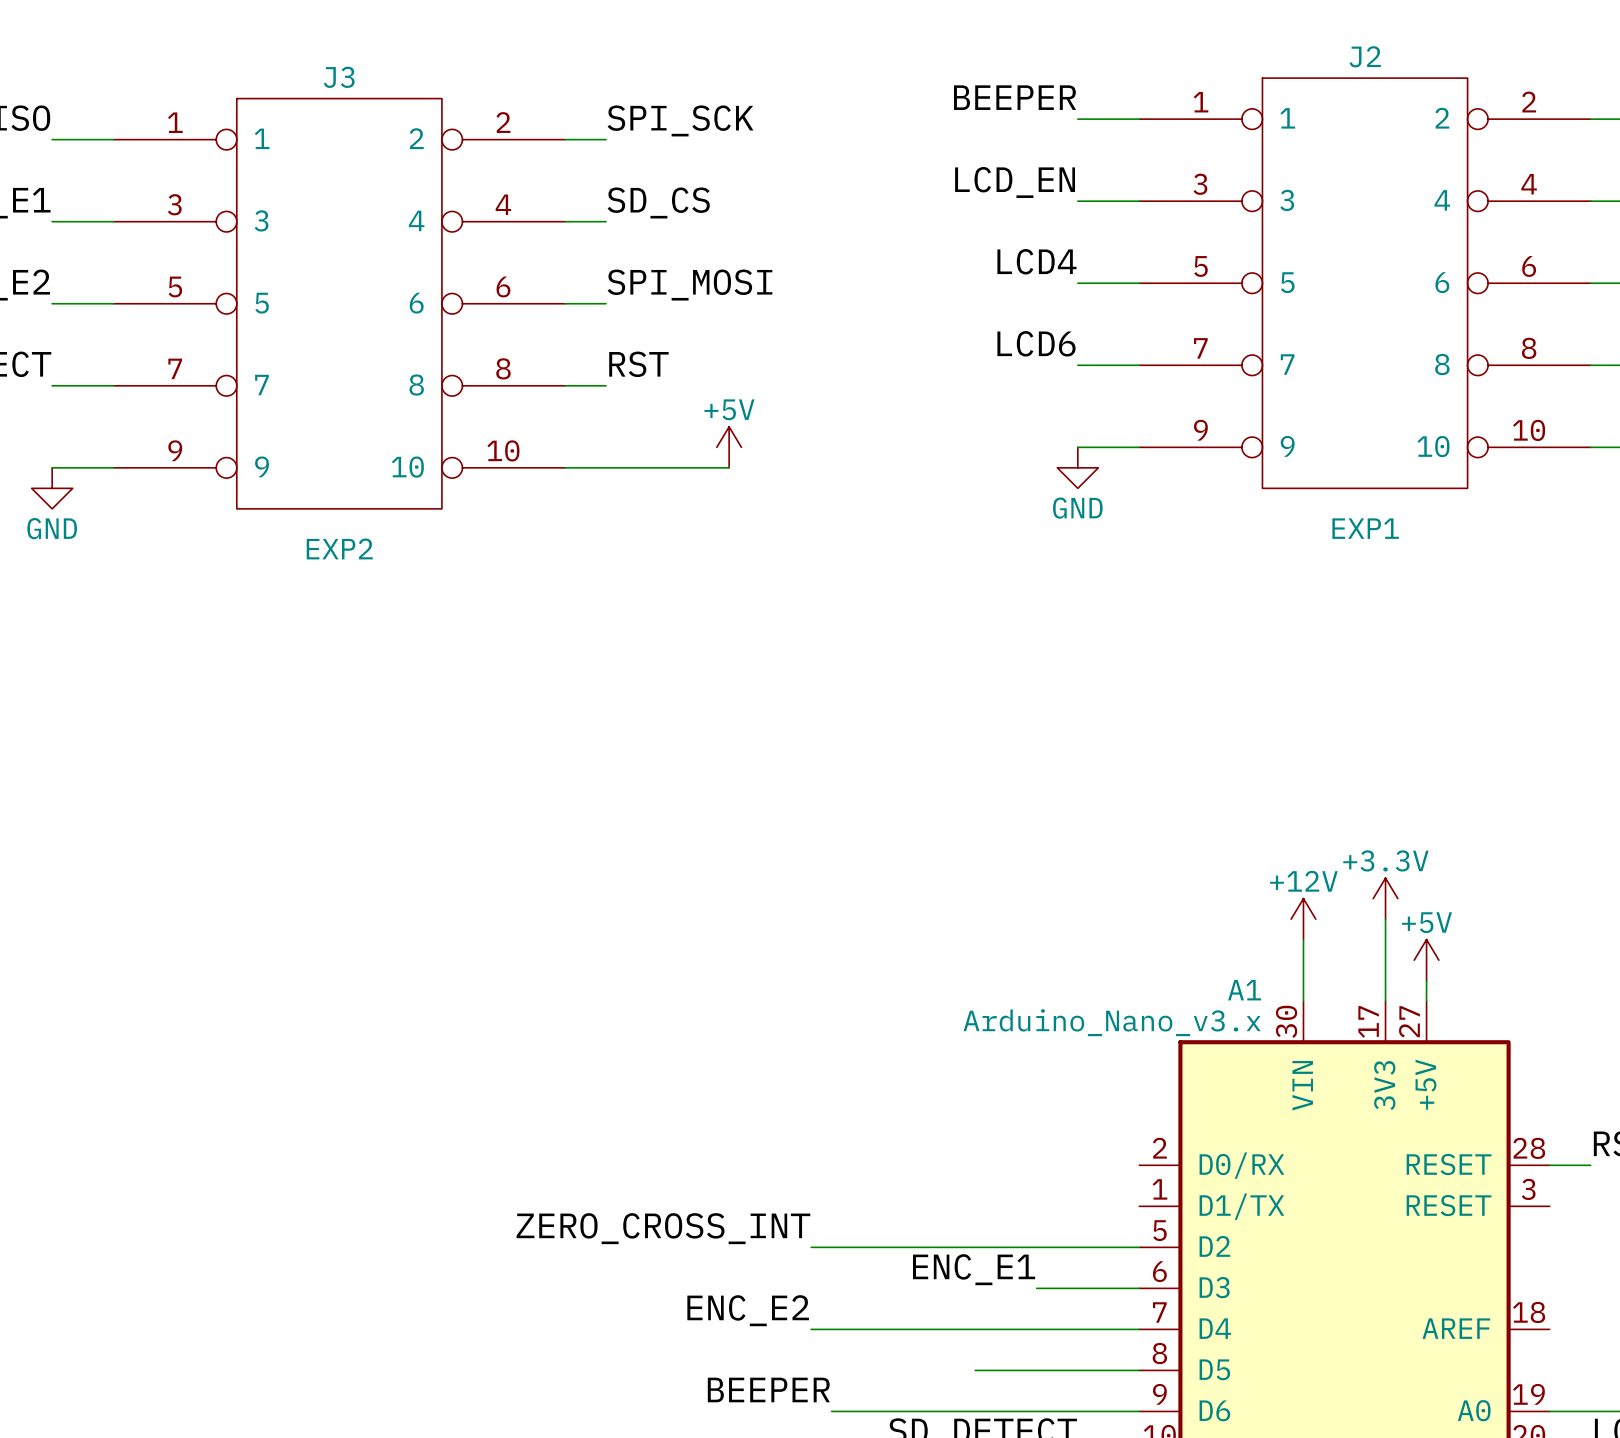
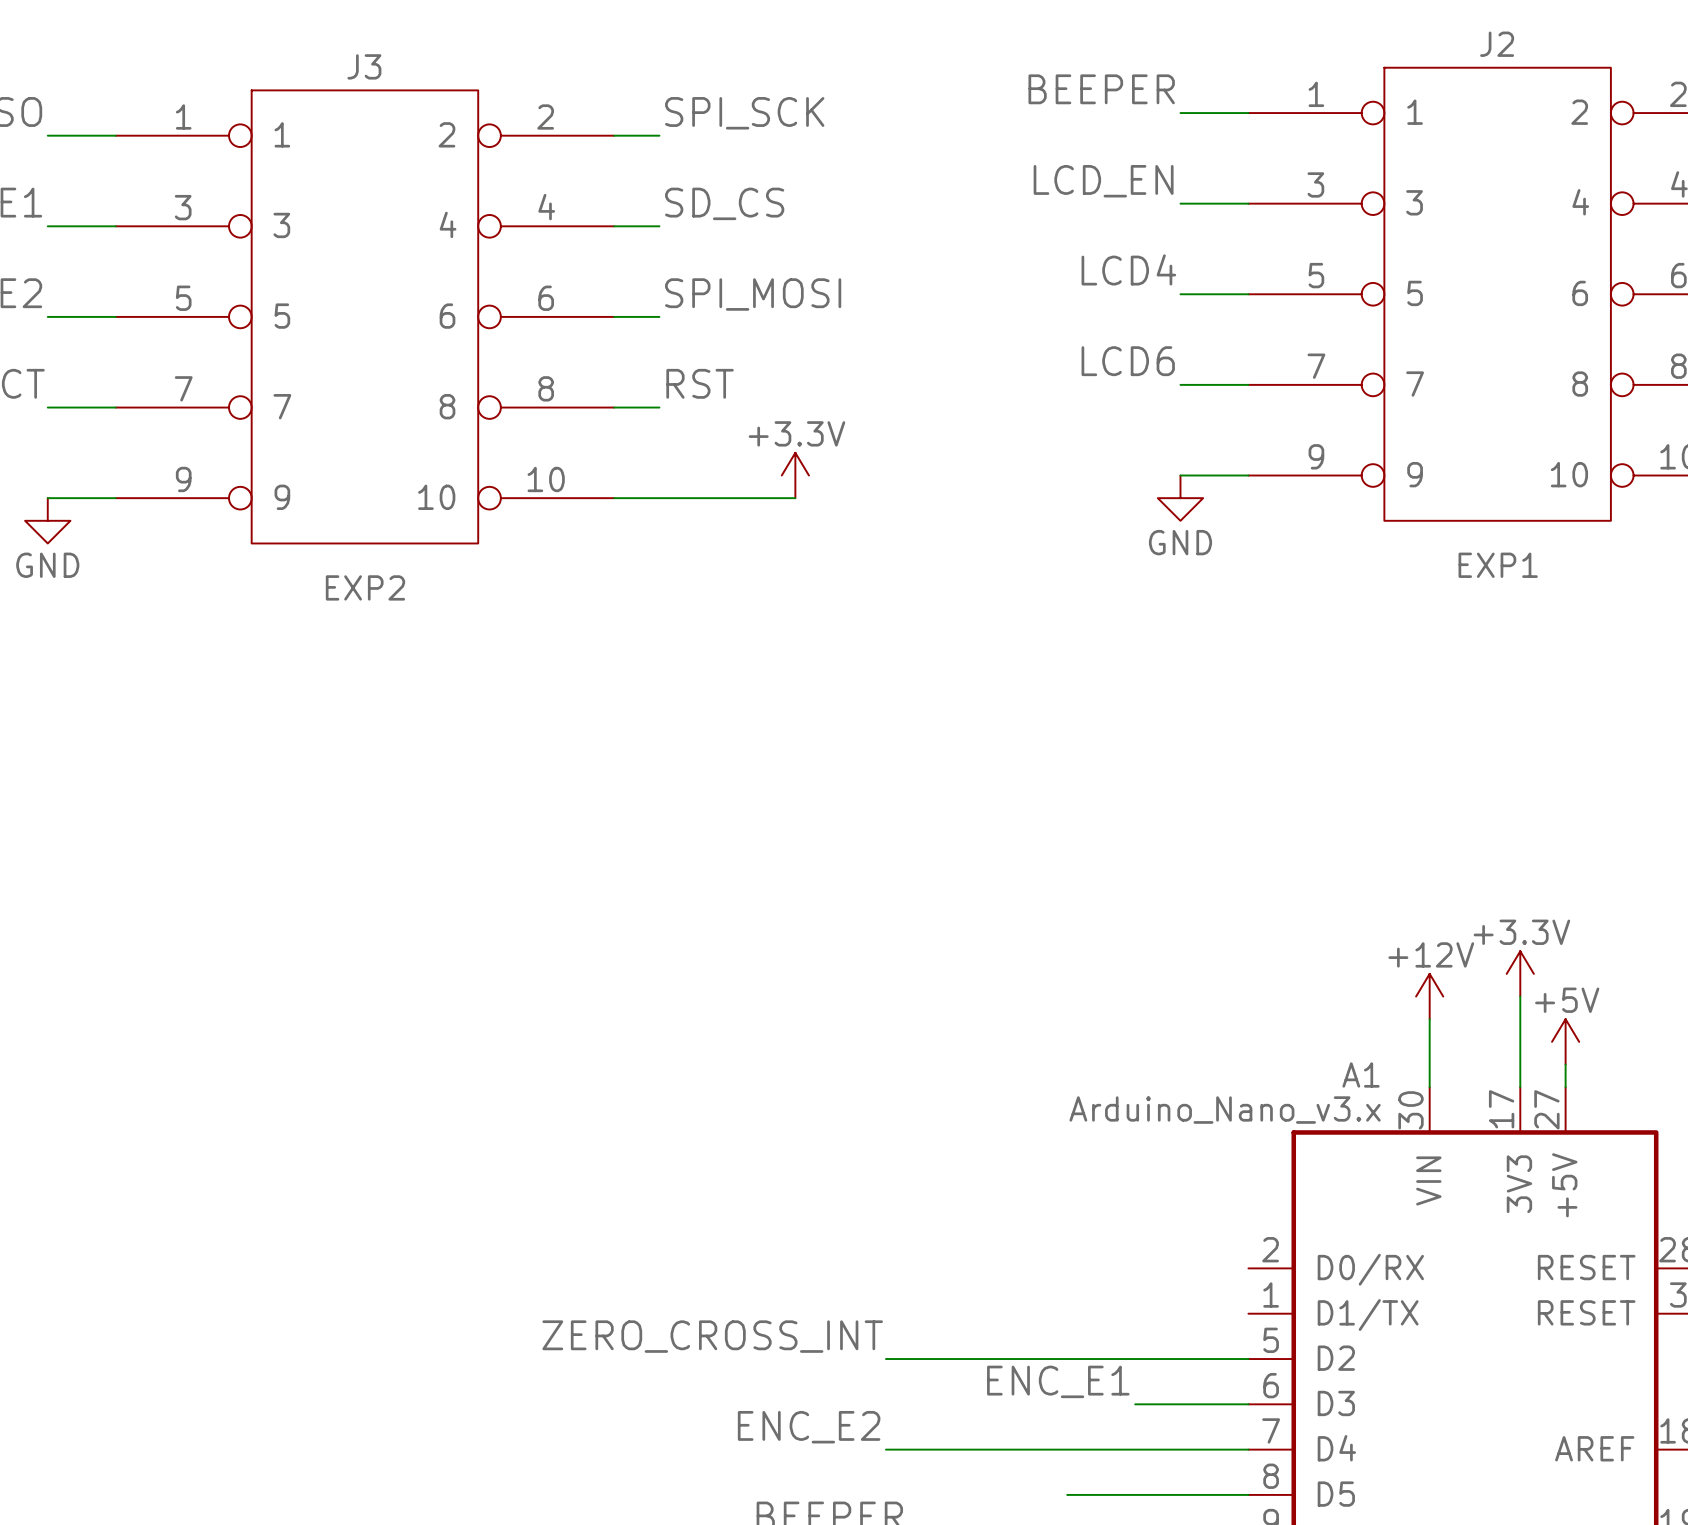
power symbol: +5V (729, 447) -> +3.3V (795, 475)

